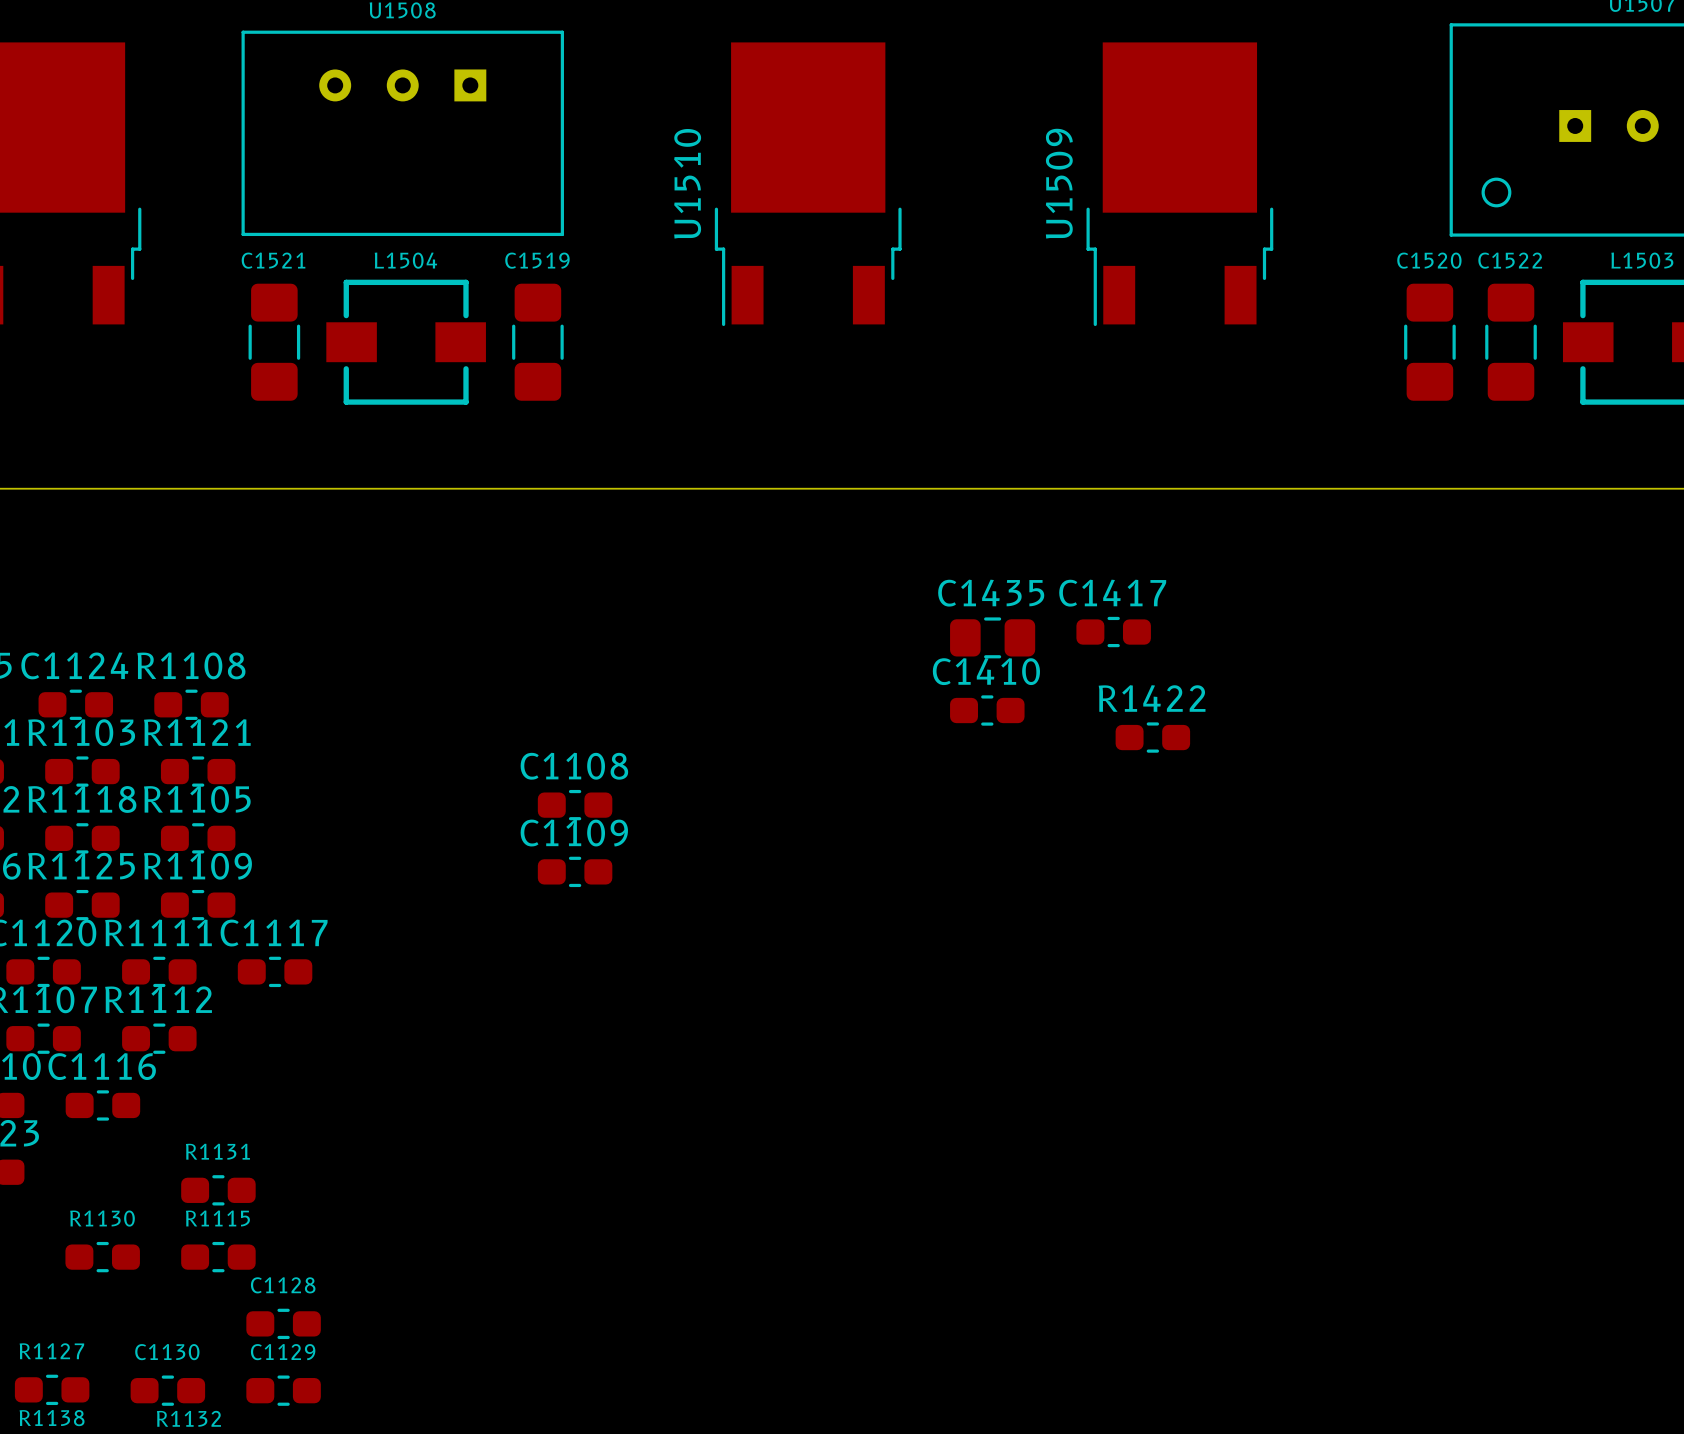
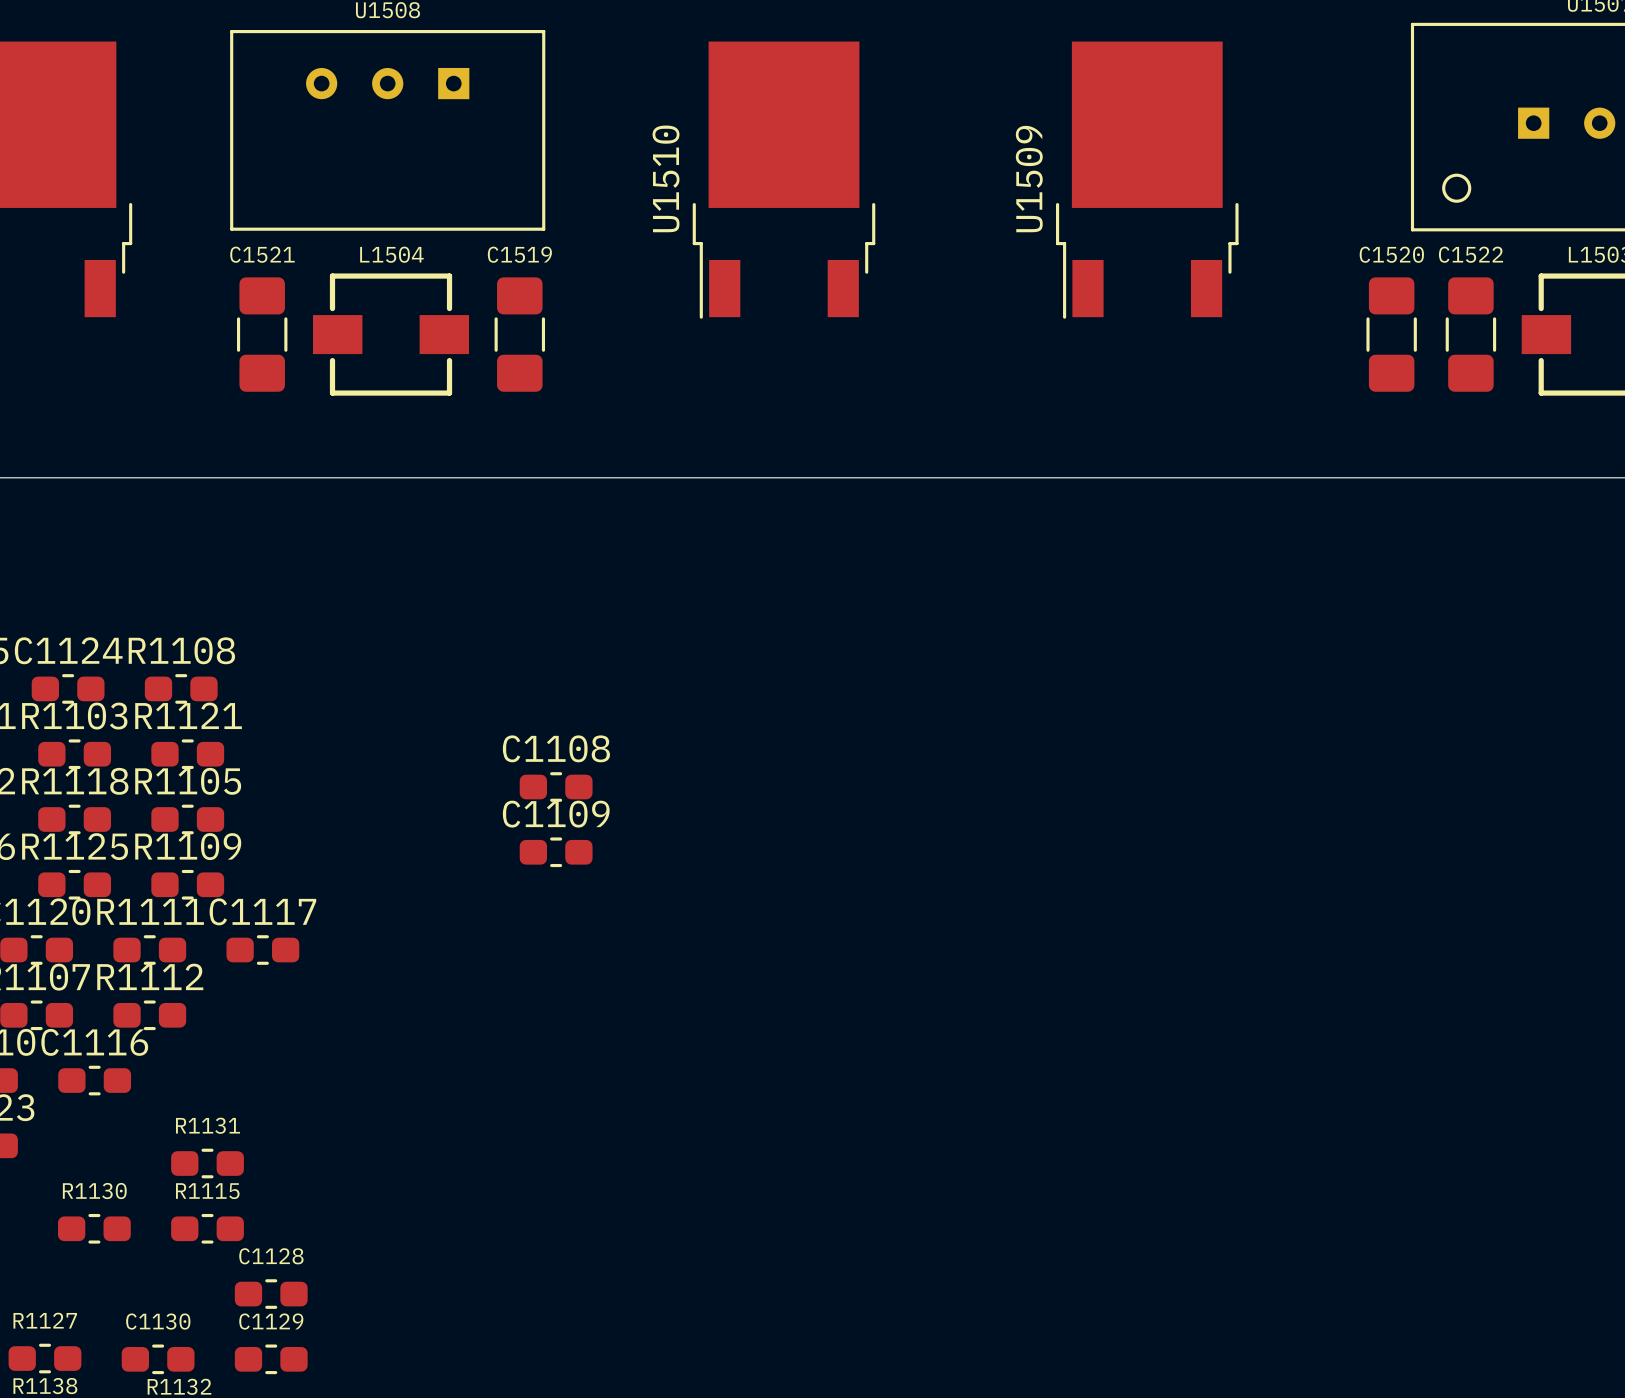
C1417: (1113, 632) -> none
C1435: (992, 637) -> none
C1410: (987, 710) -> none
R1422: (1152, 737) -> none

